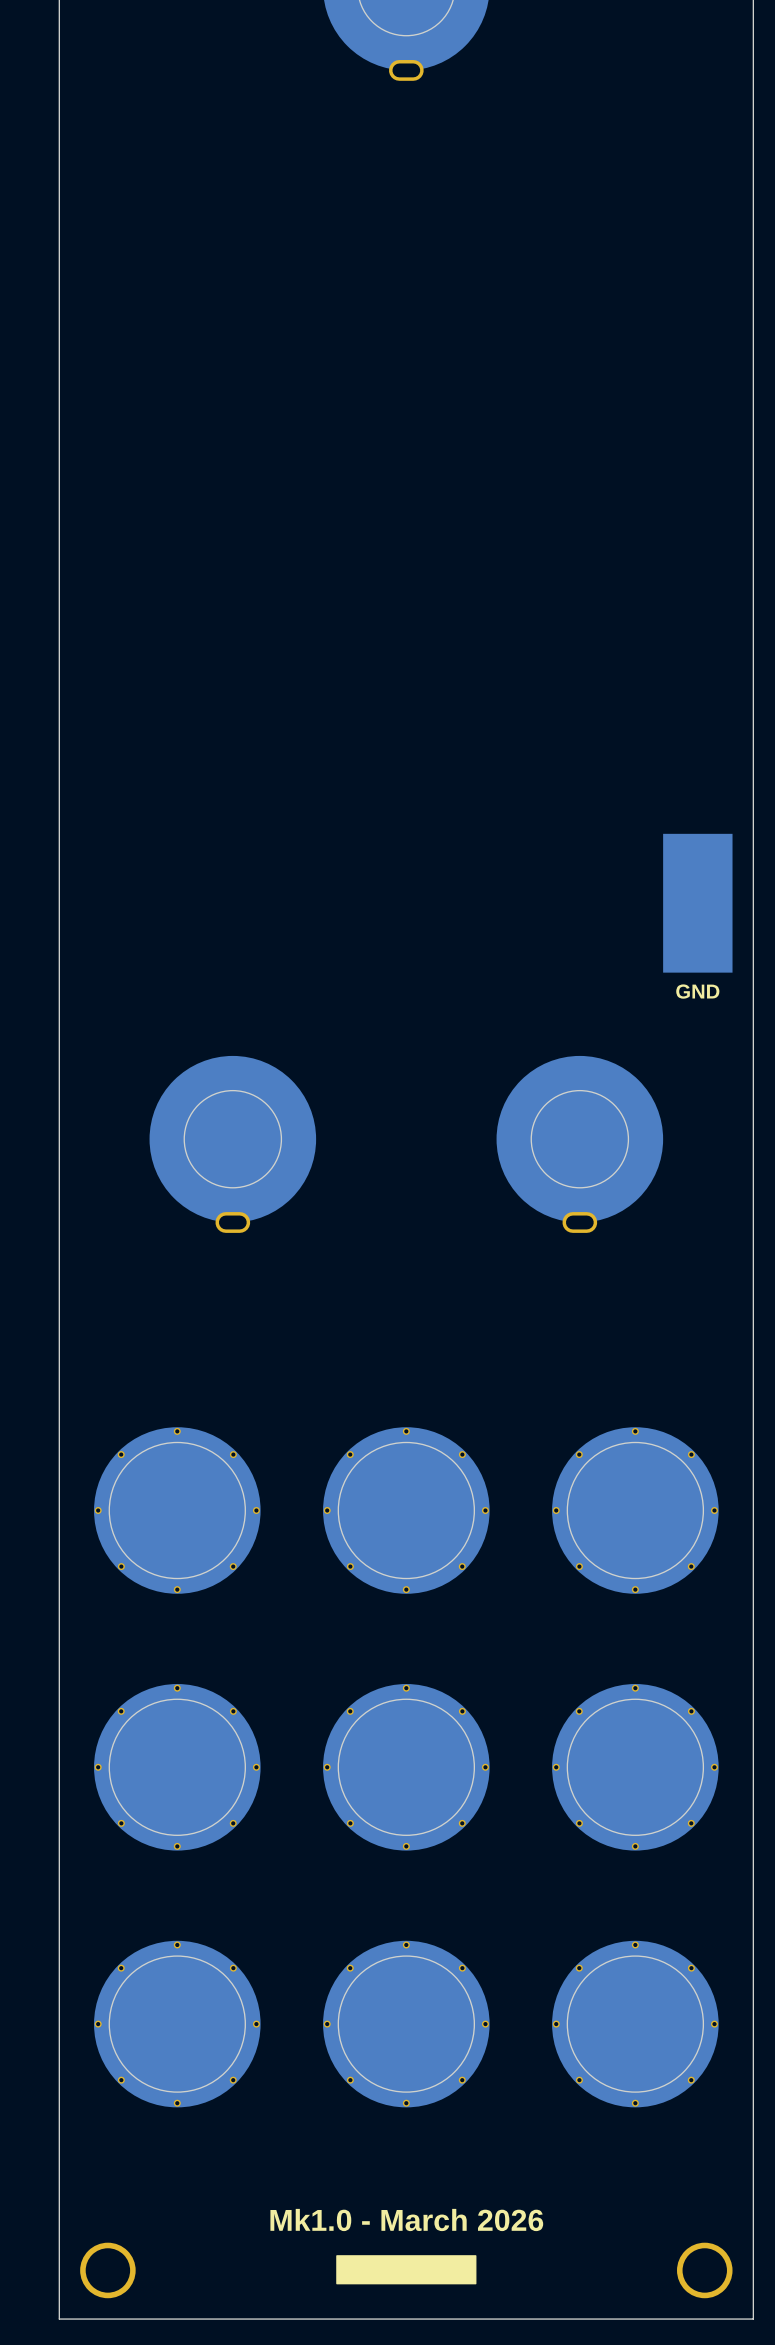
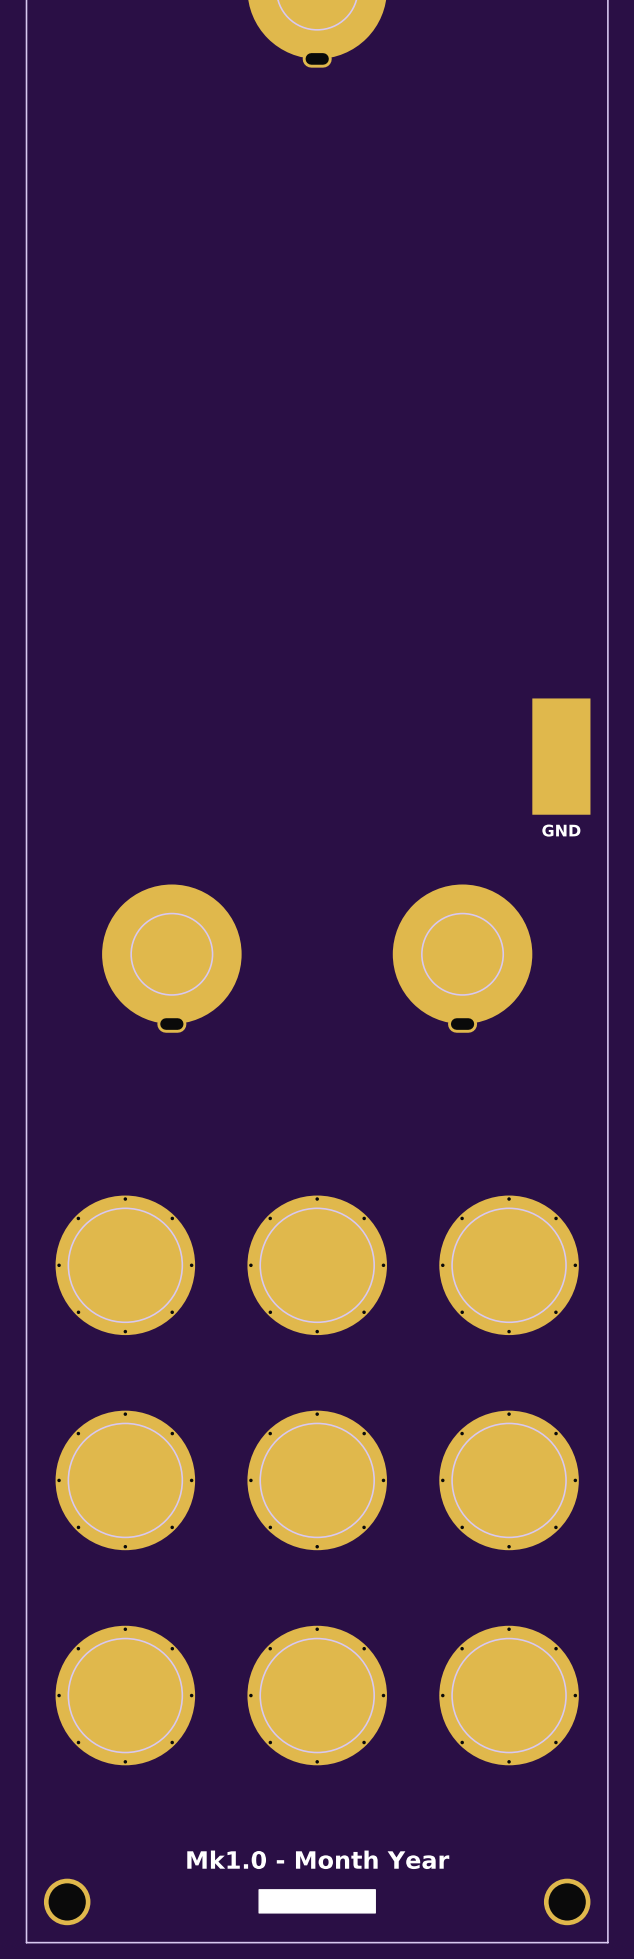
text: Mk1.0 - March 2026 (406, 2220) -> Mk1.0 - Month Year (318, 1859)

